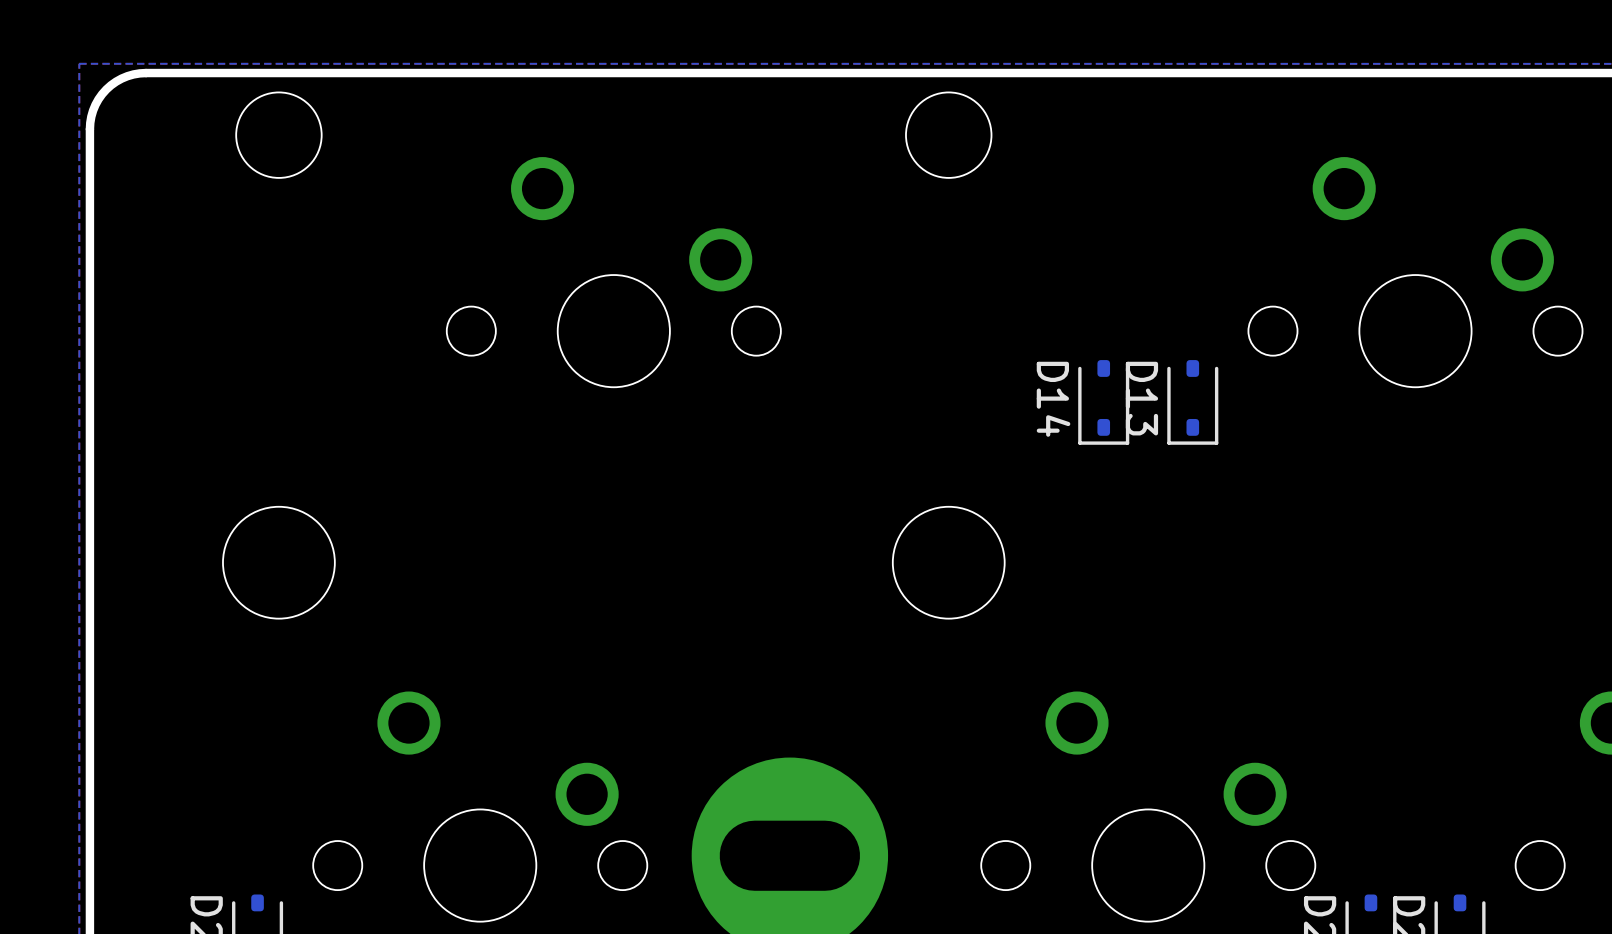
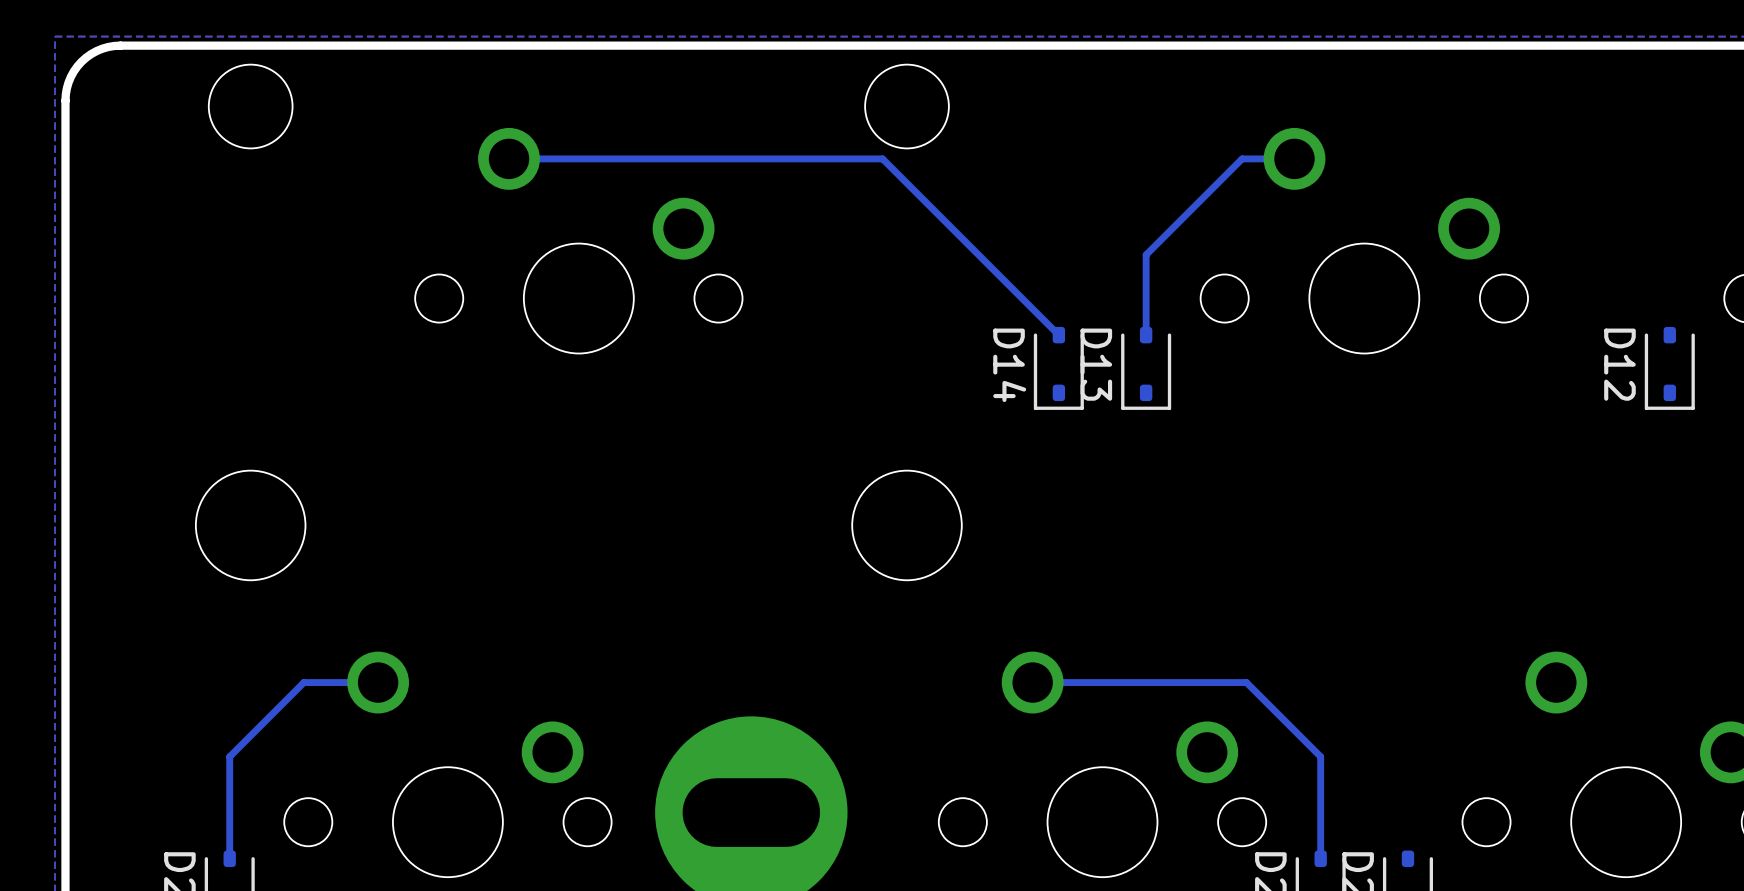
bottom track: none -> (509, 158) (882, 158) (1058, 335)
bottom track: none -> (1294, 158) (1242, 158) (1146, 254) (1146, 335)
bottom track: none -> (378, 682) (303, 682) (229, 756) (229, 858)
bottom track: none -> (1032, 682) (1246, 682) (1320, 756) (1320, 858)

